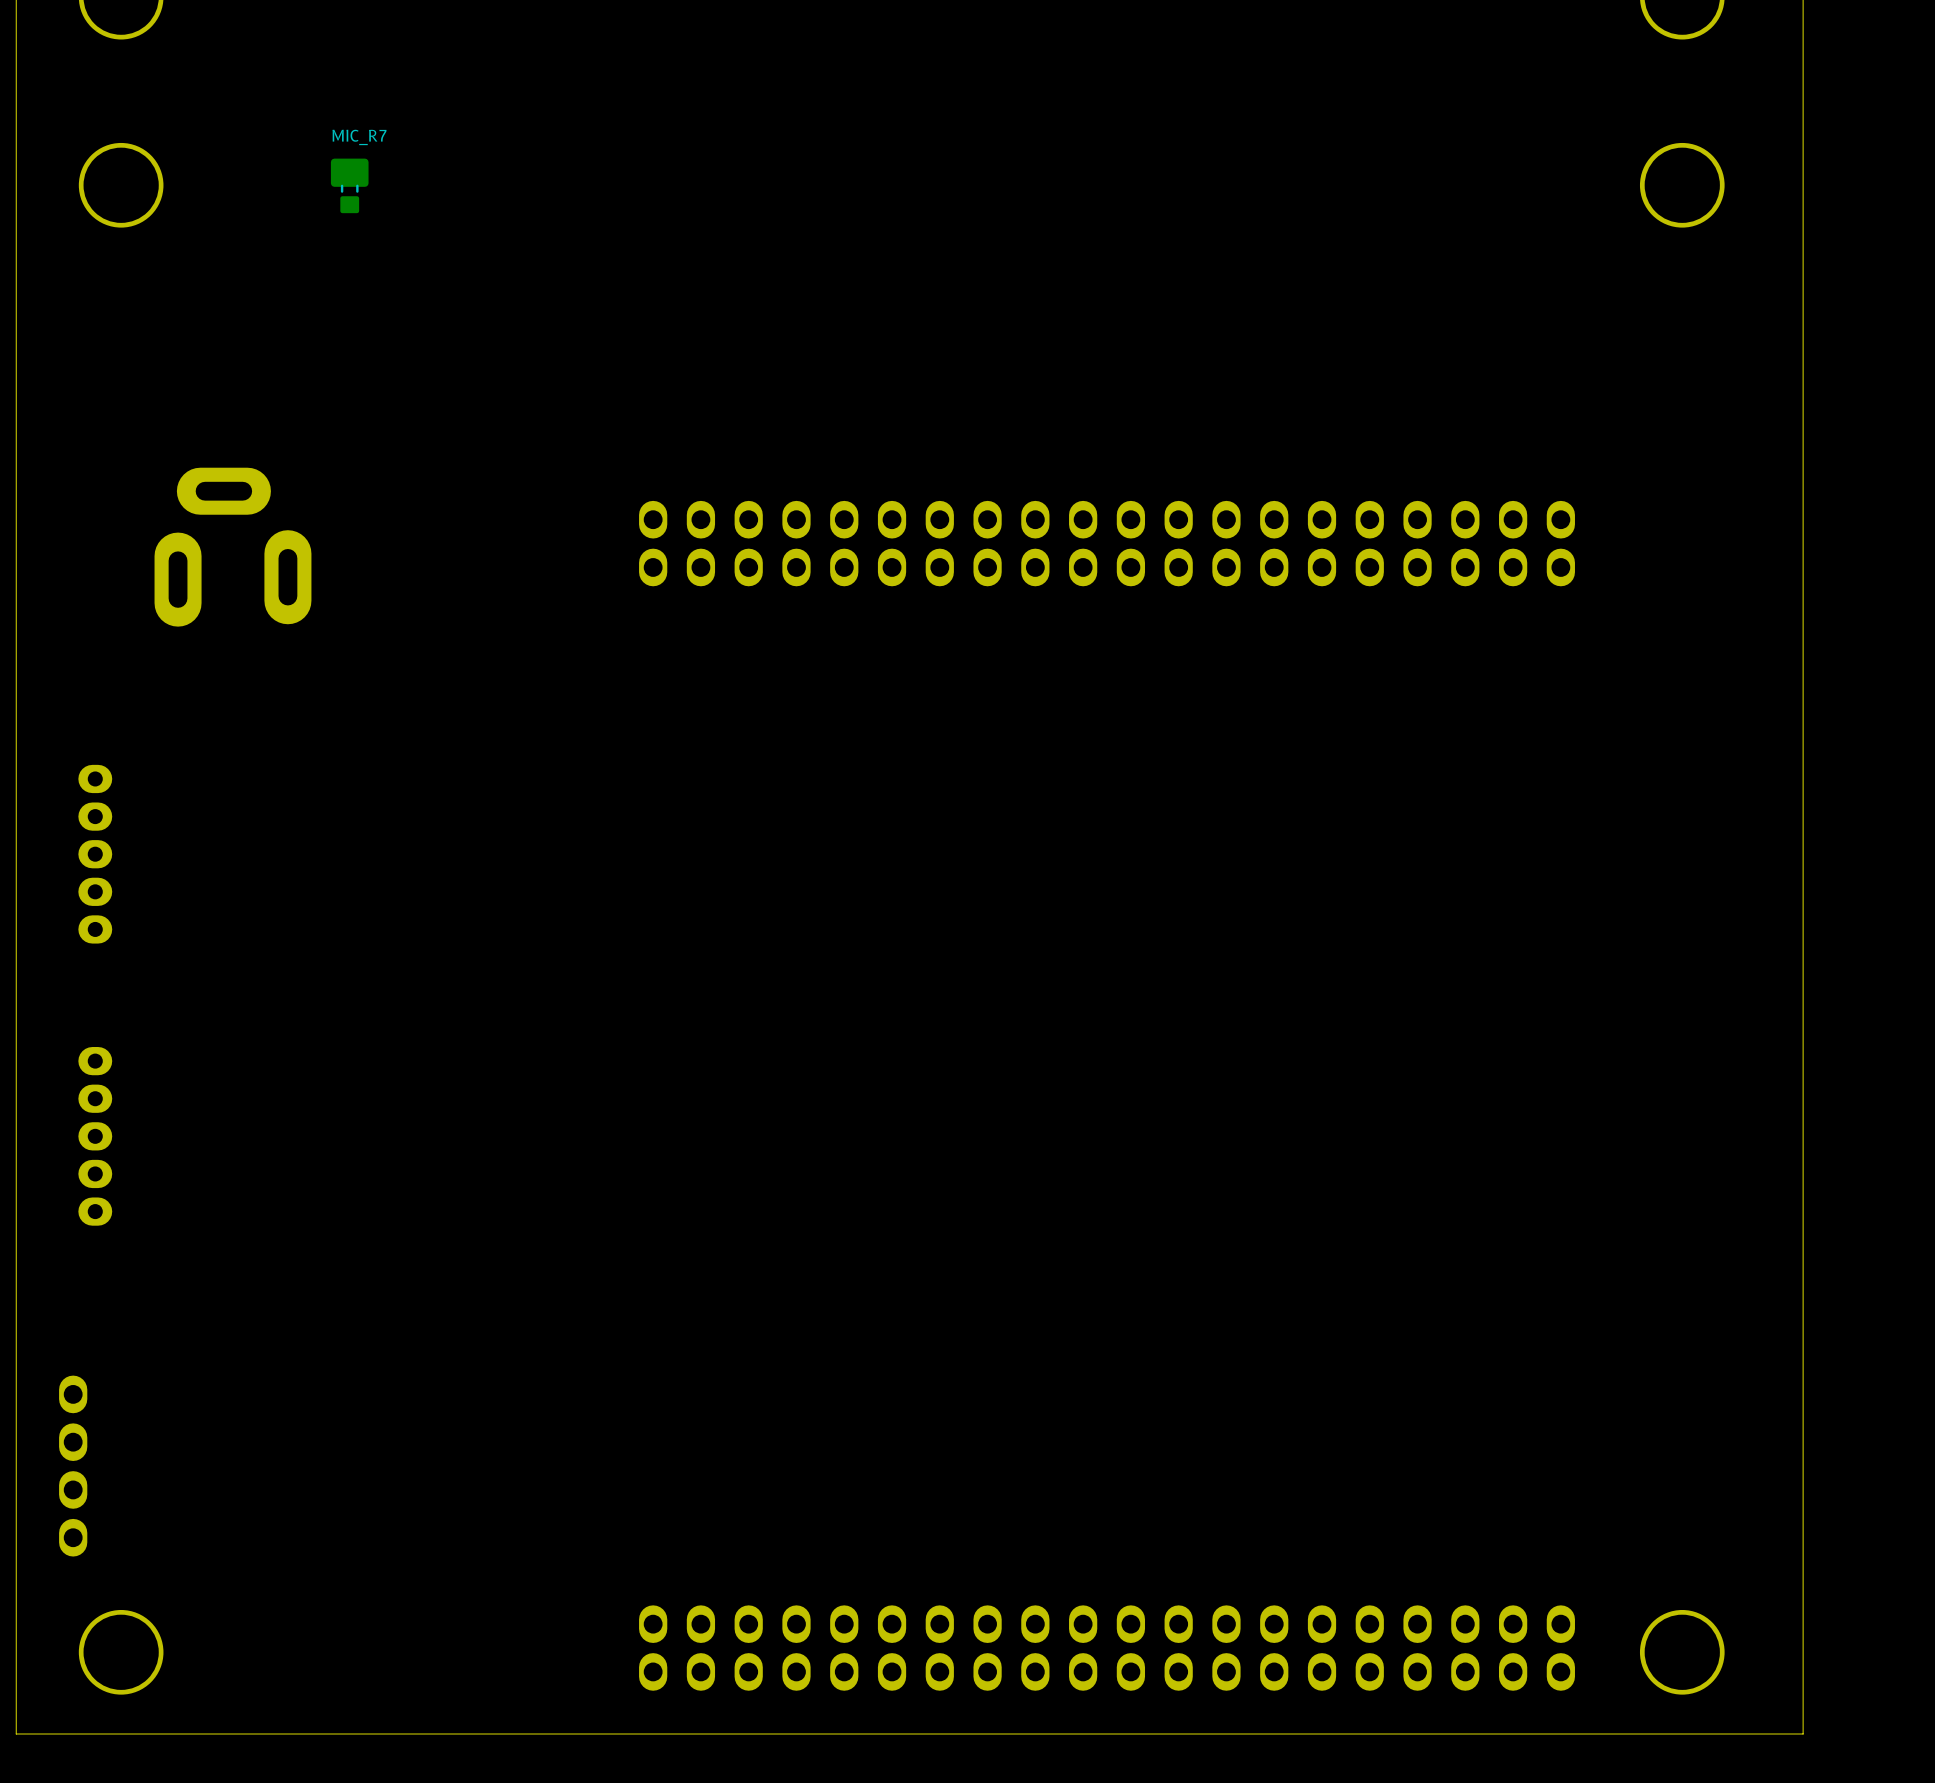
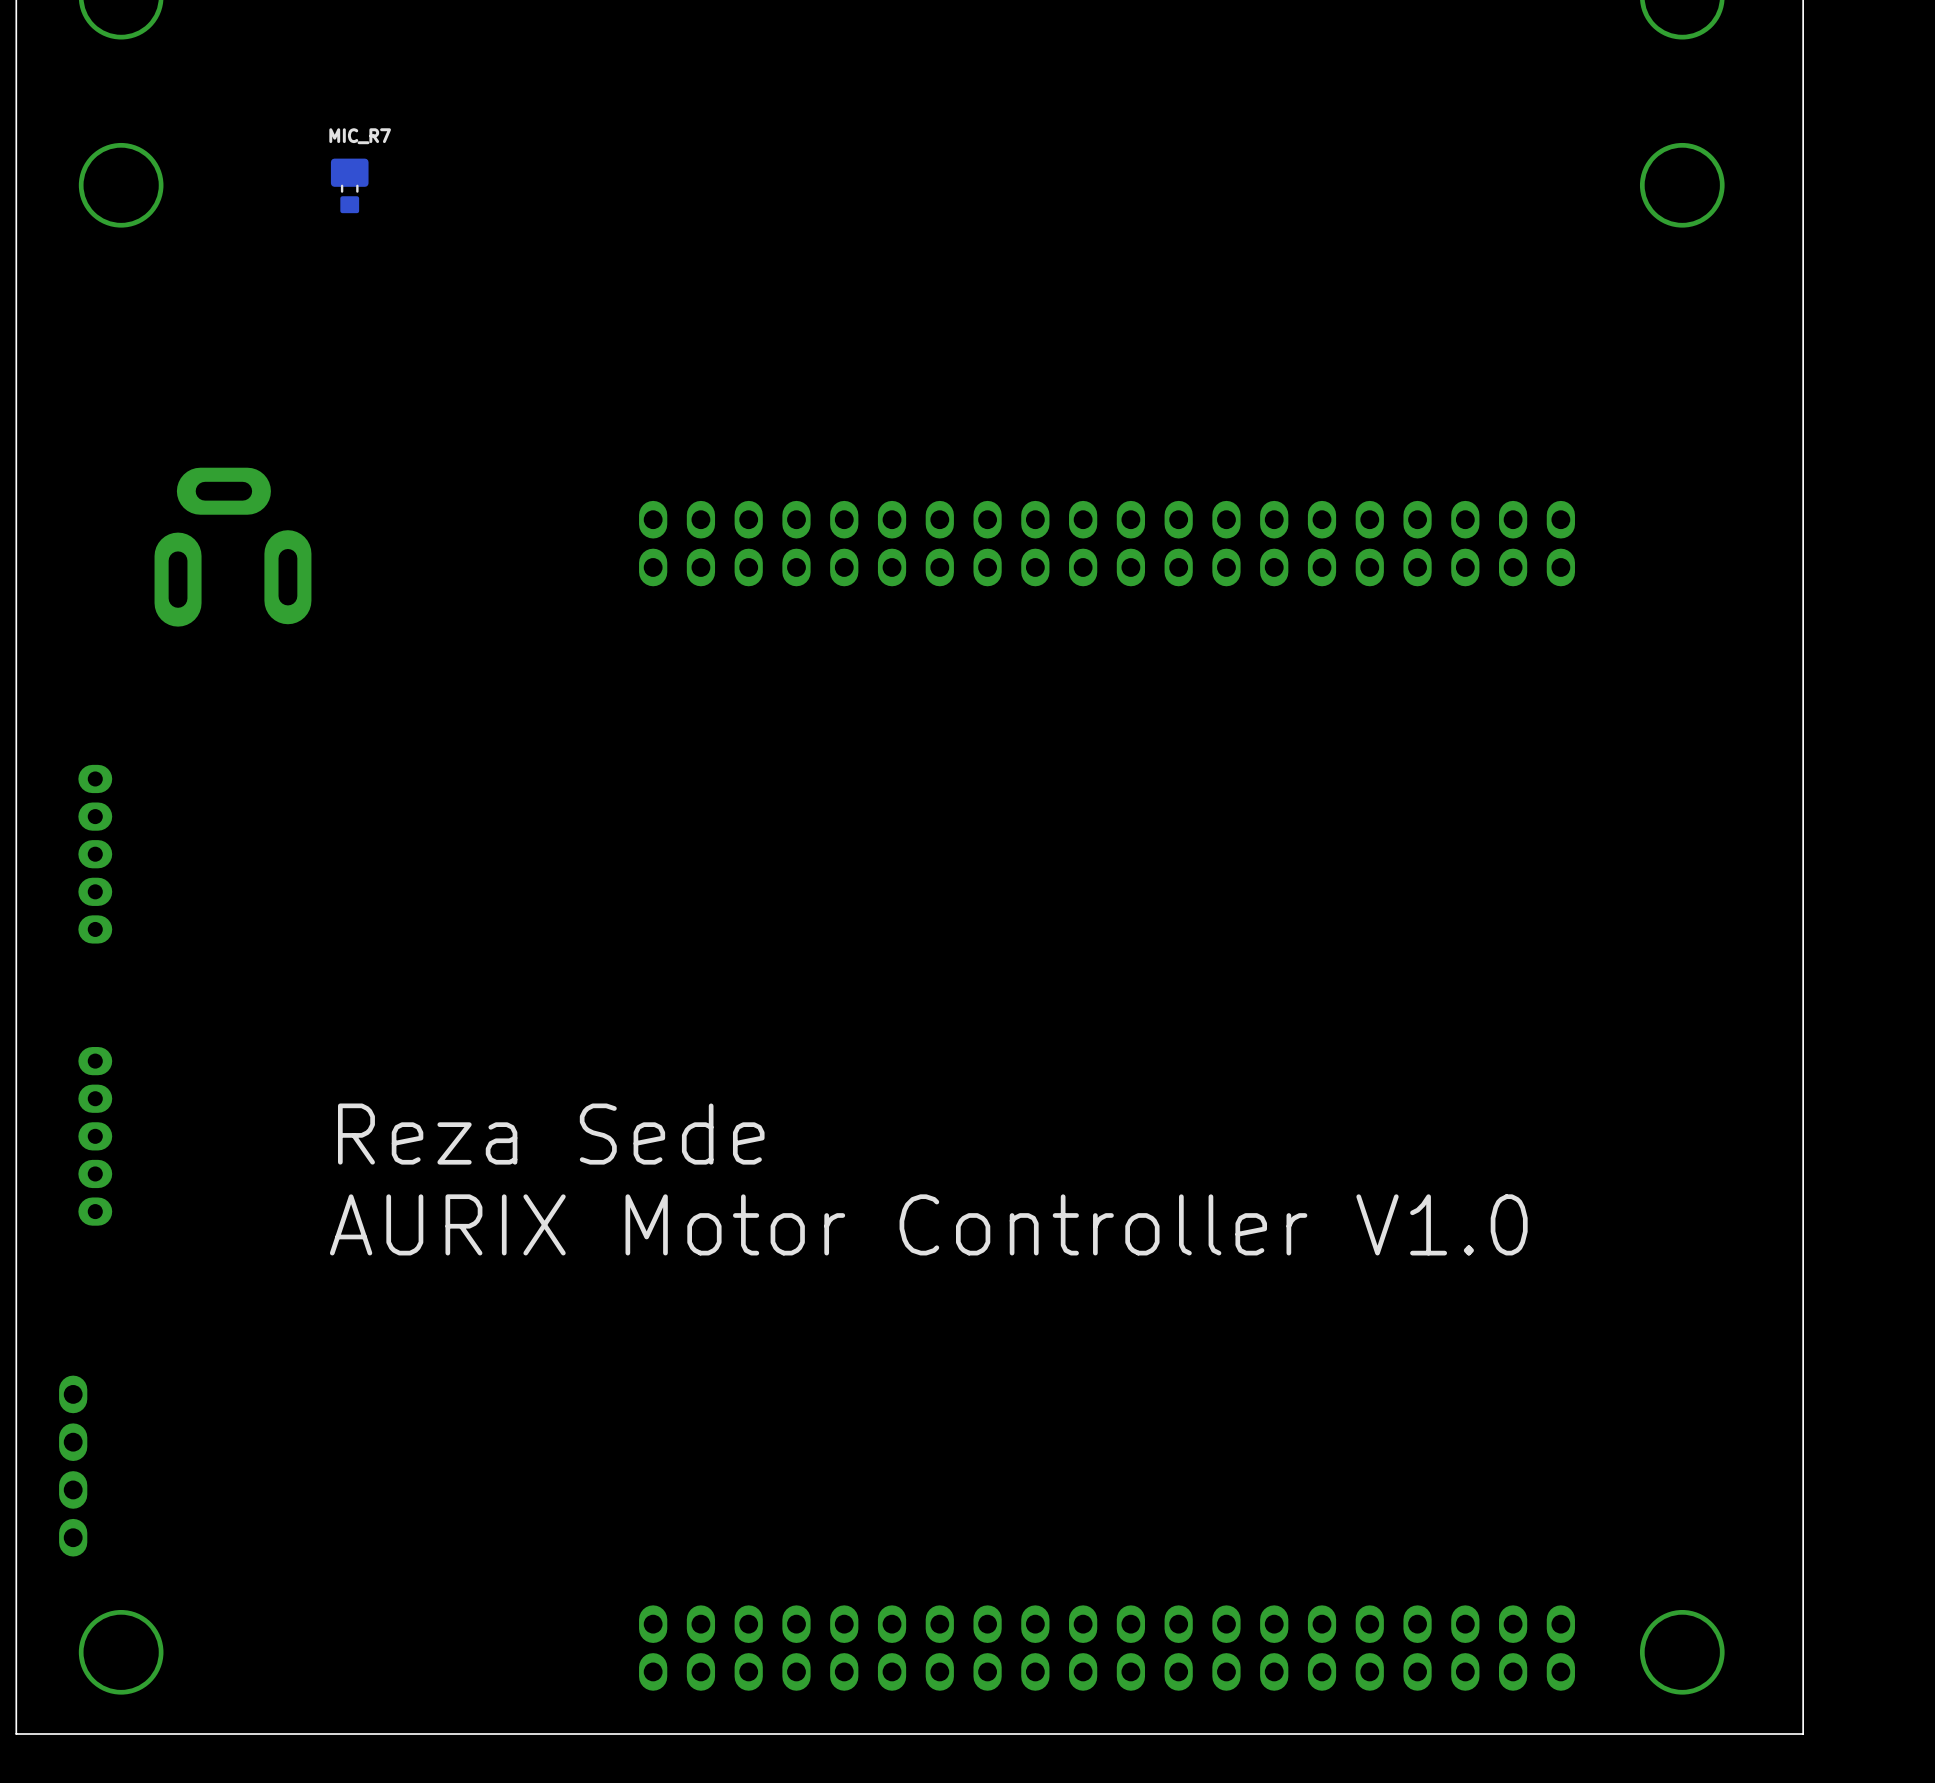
text: none -> Reza Sede (551, 1134)
text: none -> AURIX Motor Controller V1.0 (928, 1224)

